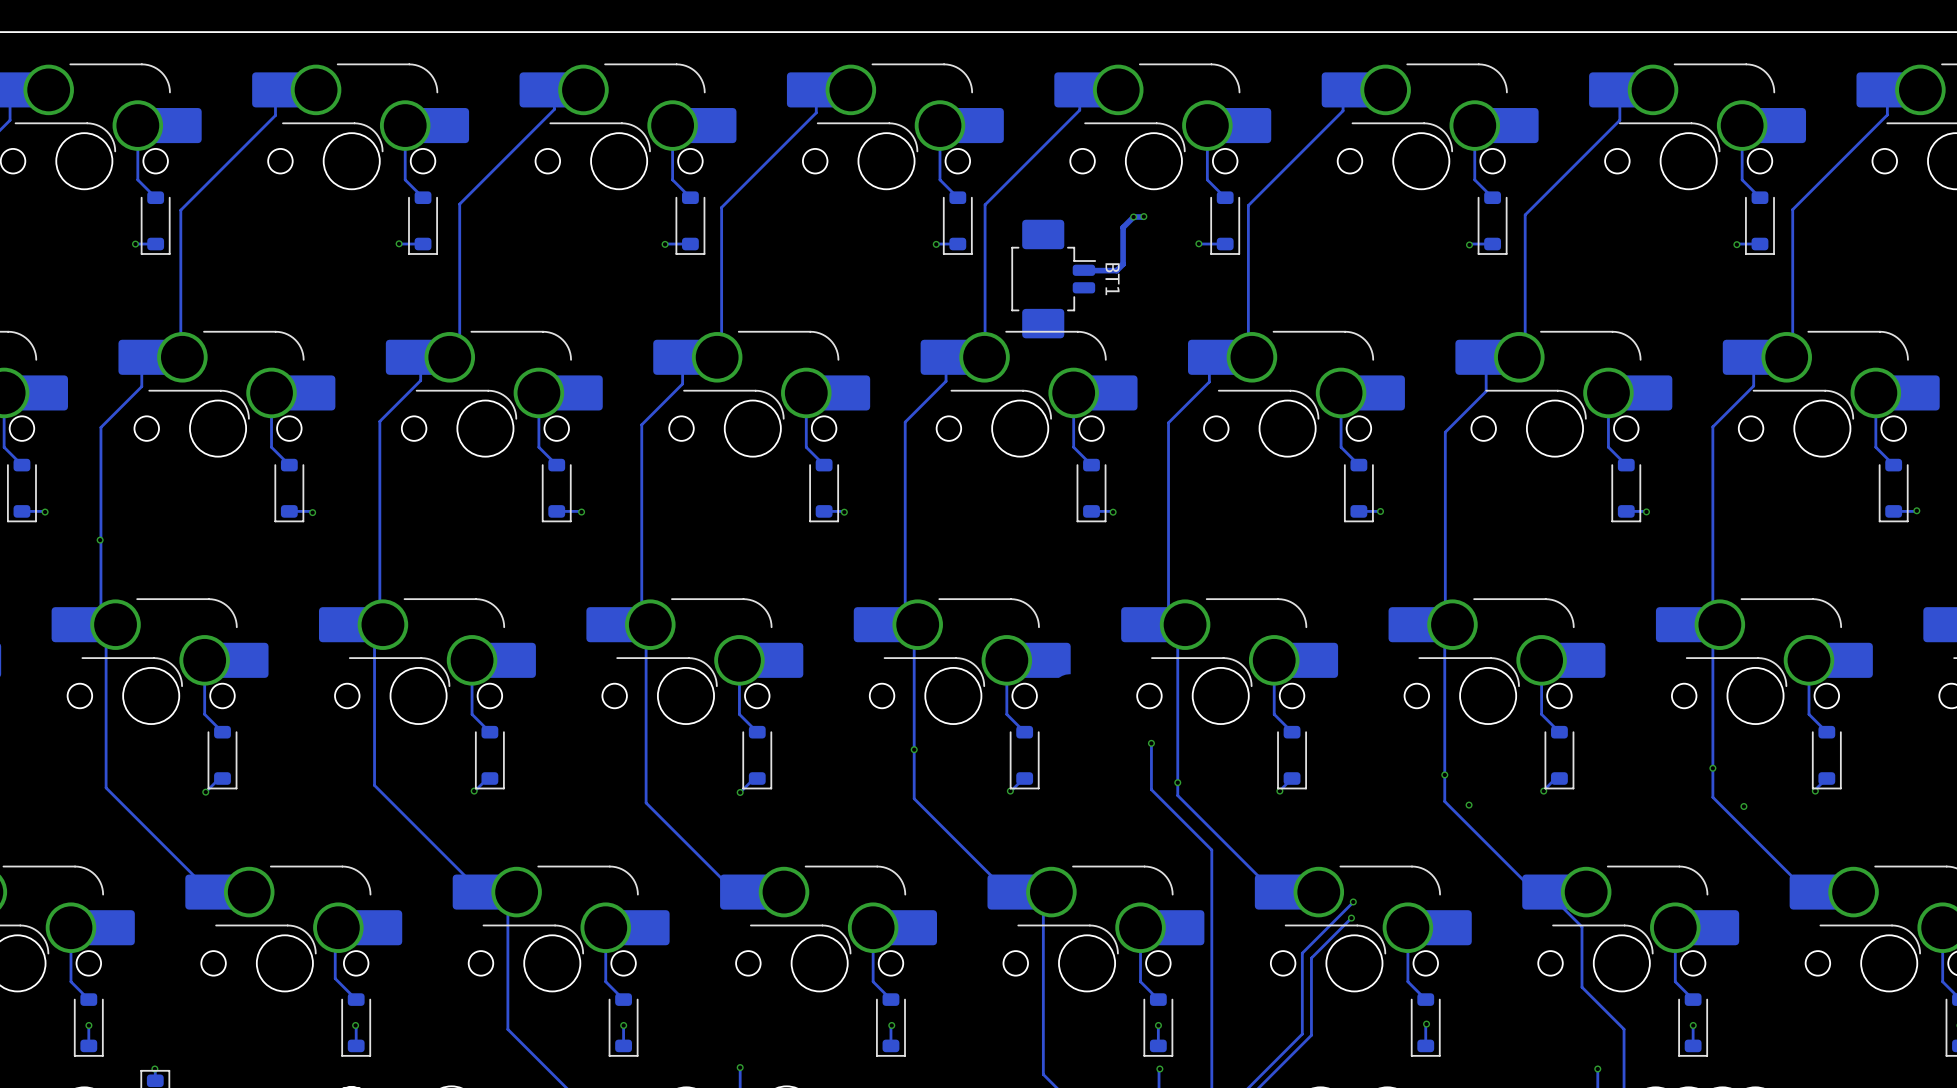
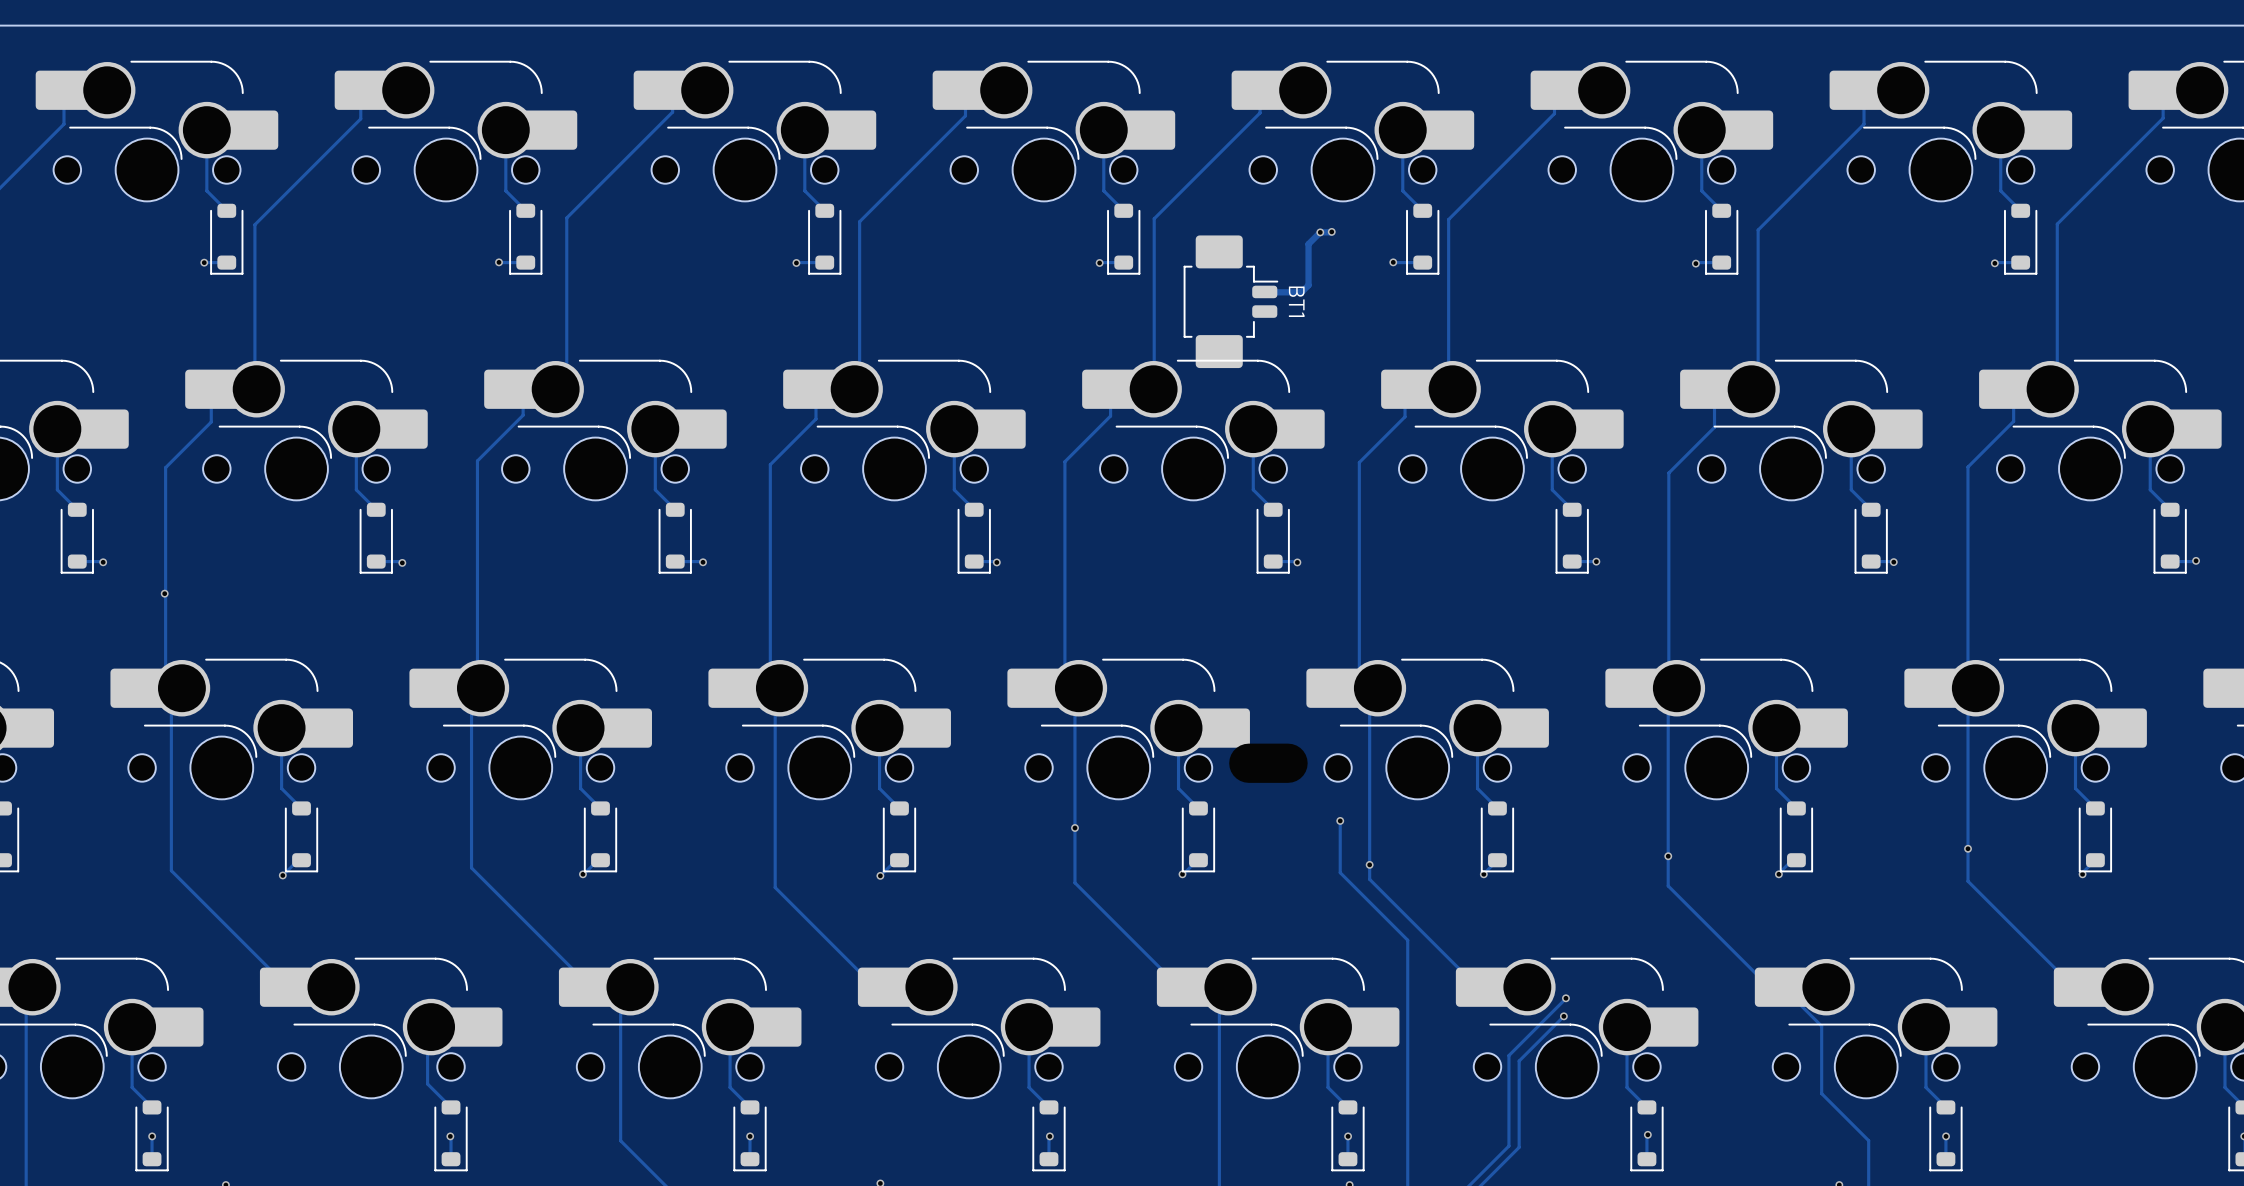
via: (1469, 805) -> none
via: (1743, 806) -> none

